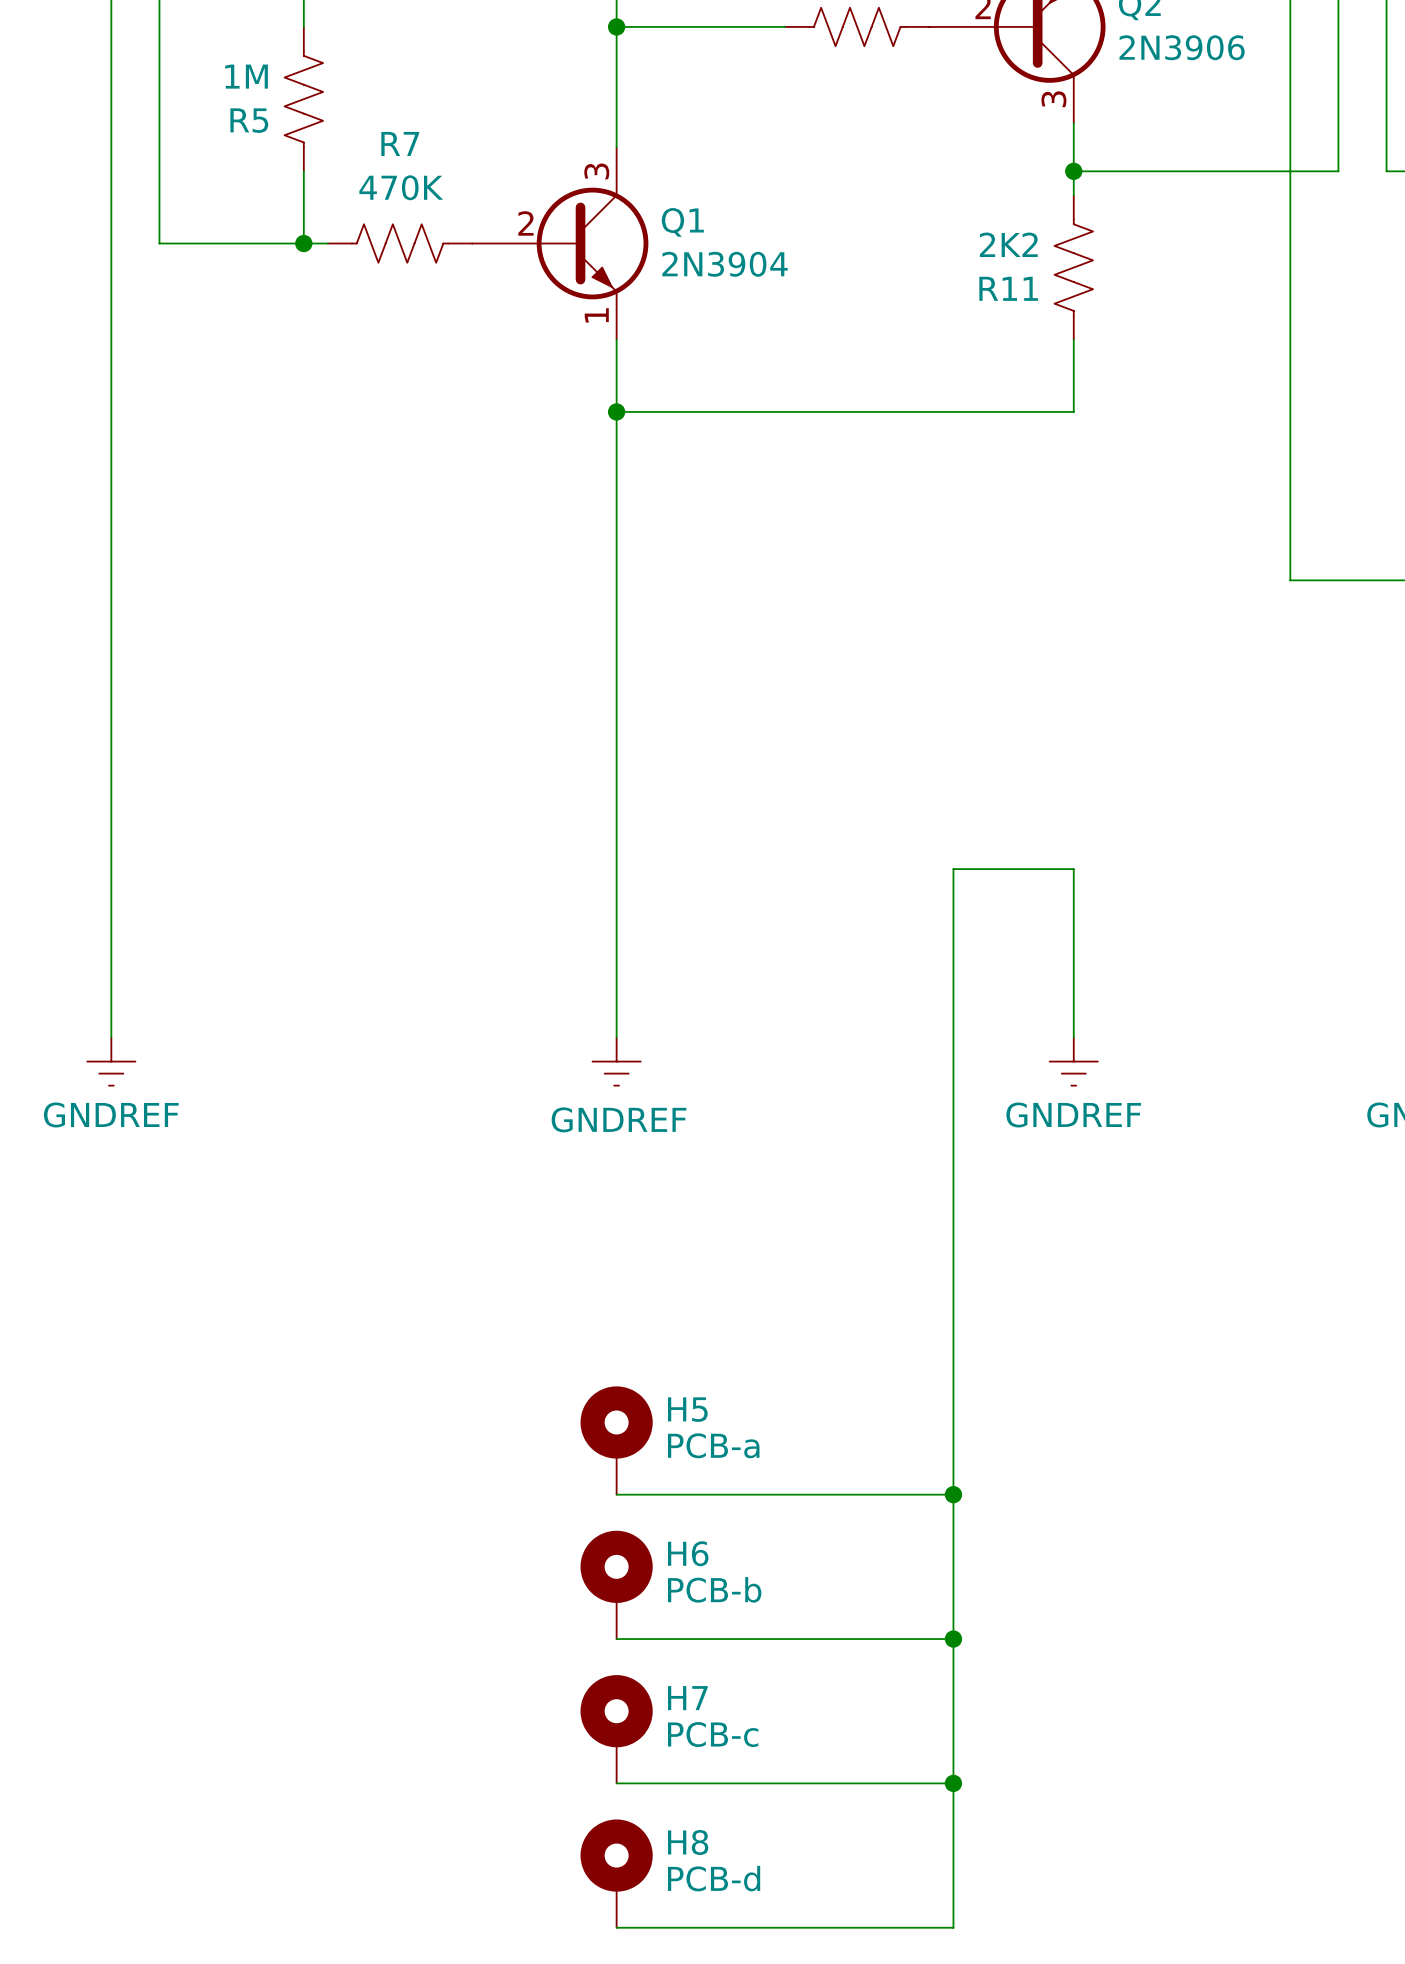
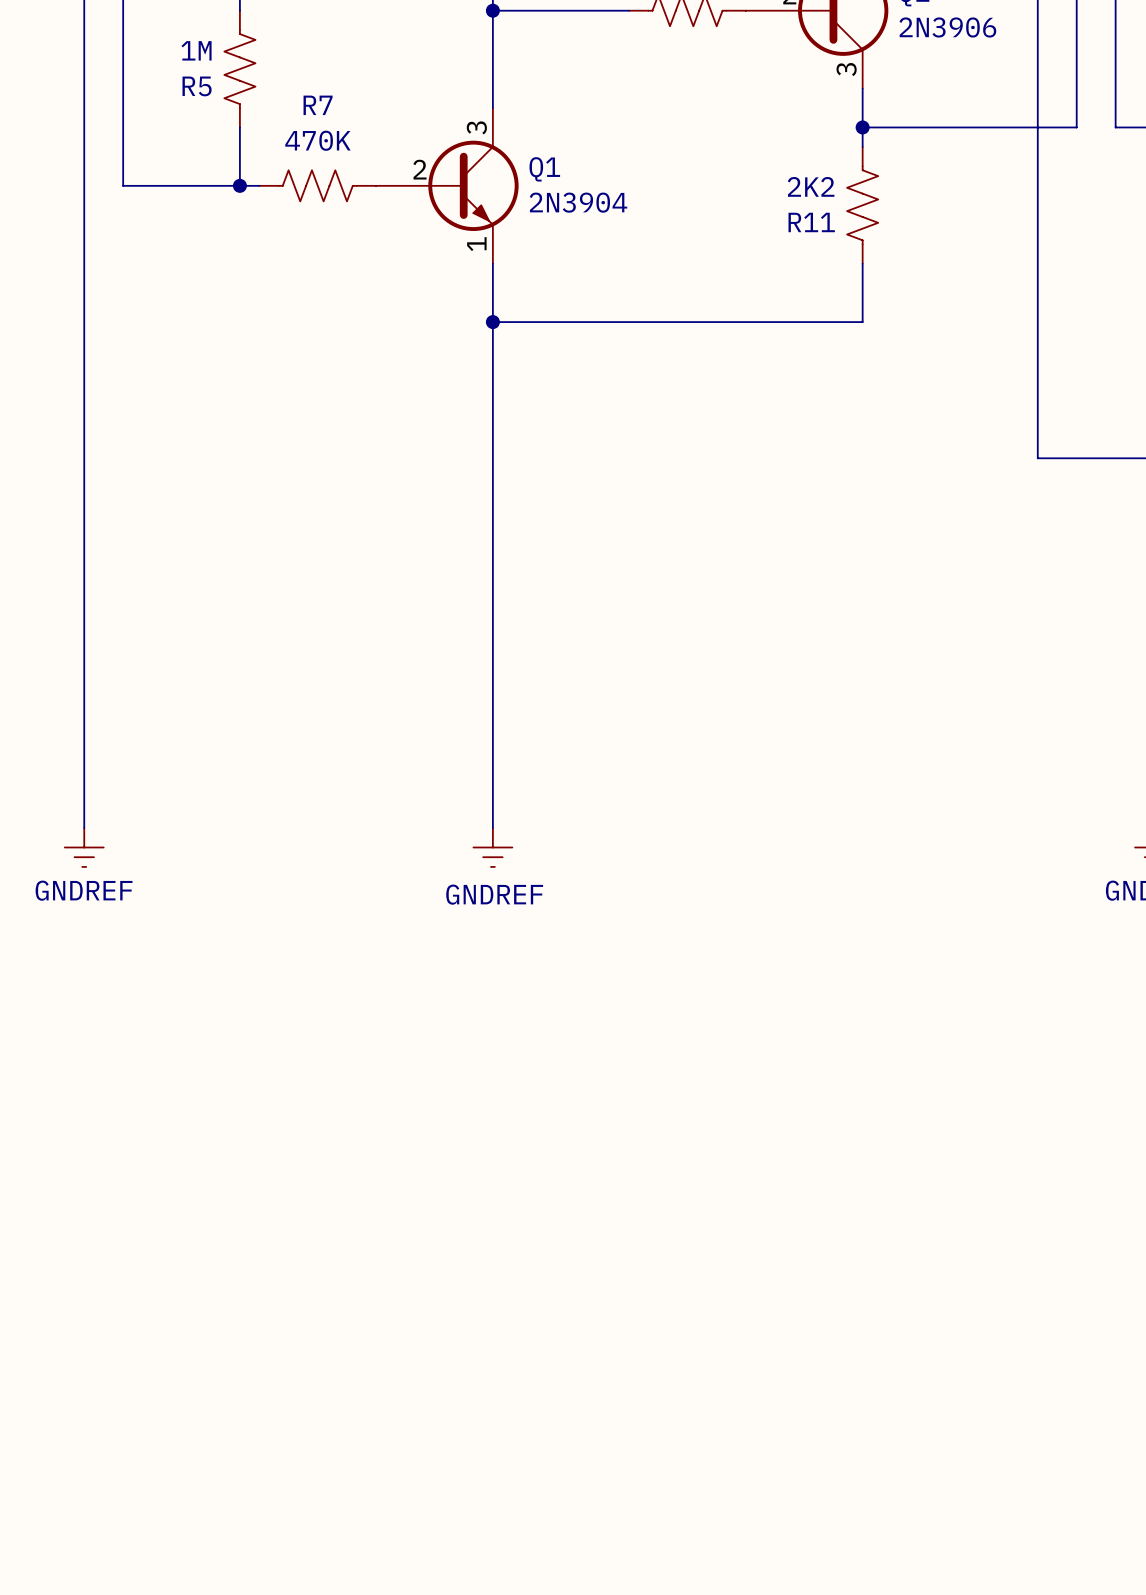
wire: (1073, 1037) (1073, 869) (953, 869) (953, 1927) (616, 1927) -> none
power symbol: GNDREF (1073, 1061) -> none
H5: PCB-a (616, 1440) -> none
wire: (616, 1494) (953, 1494) -> none
junction: (953, 1494) -> none
H6: PCB-b (616, 1584) -> none
wire: (616, 1639) (953, 1639) -> none
junction: (953, 1639) -> none
H7: PCB-c (616, 1729) -> none
wire: (616, 1783) (953, 1783) -> none
junction: (953, 1783) -> none
H8: PCB-d (616, 1873) -> none

